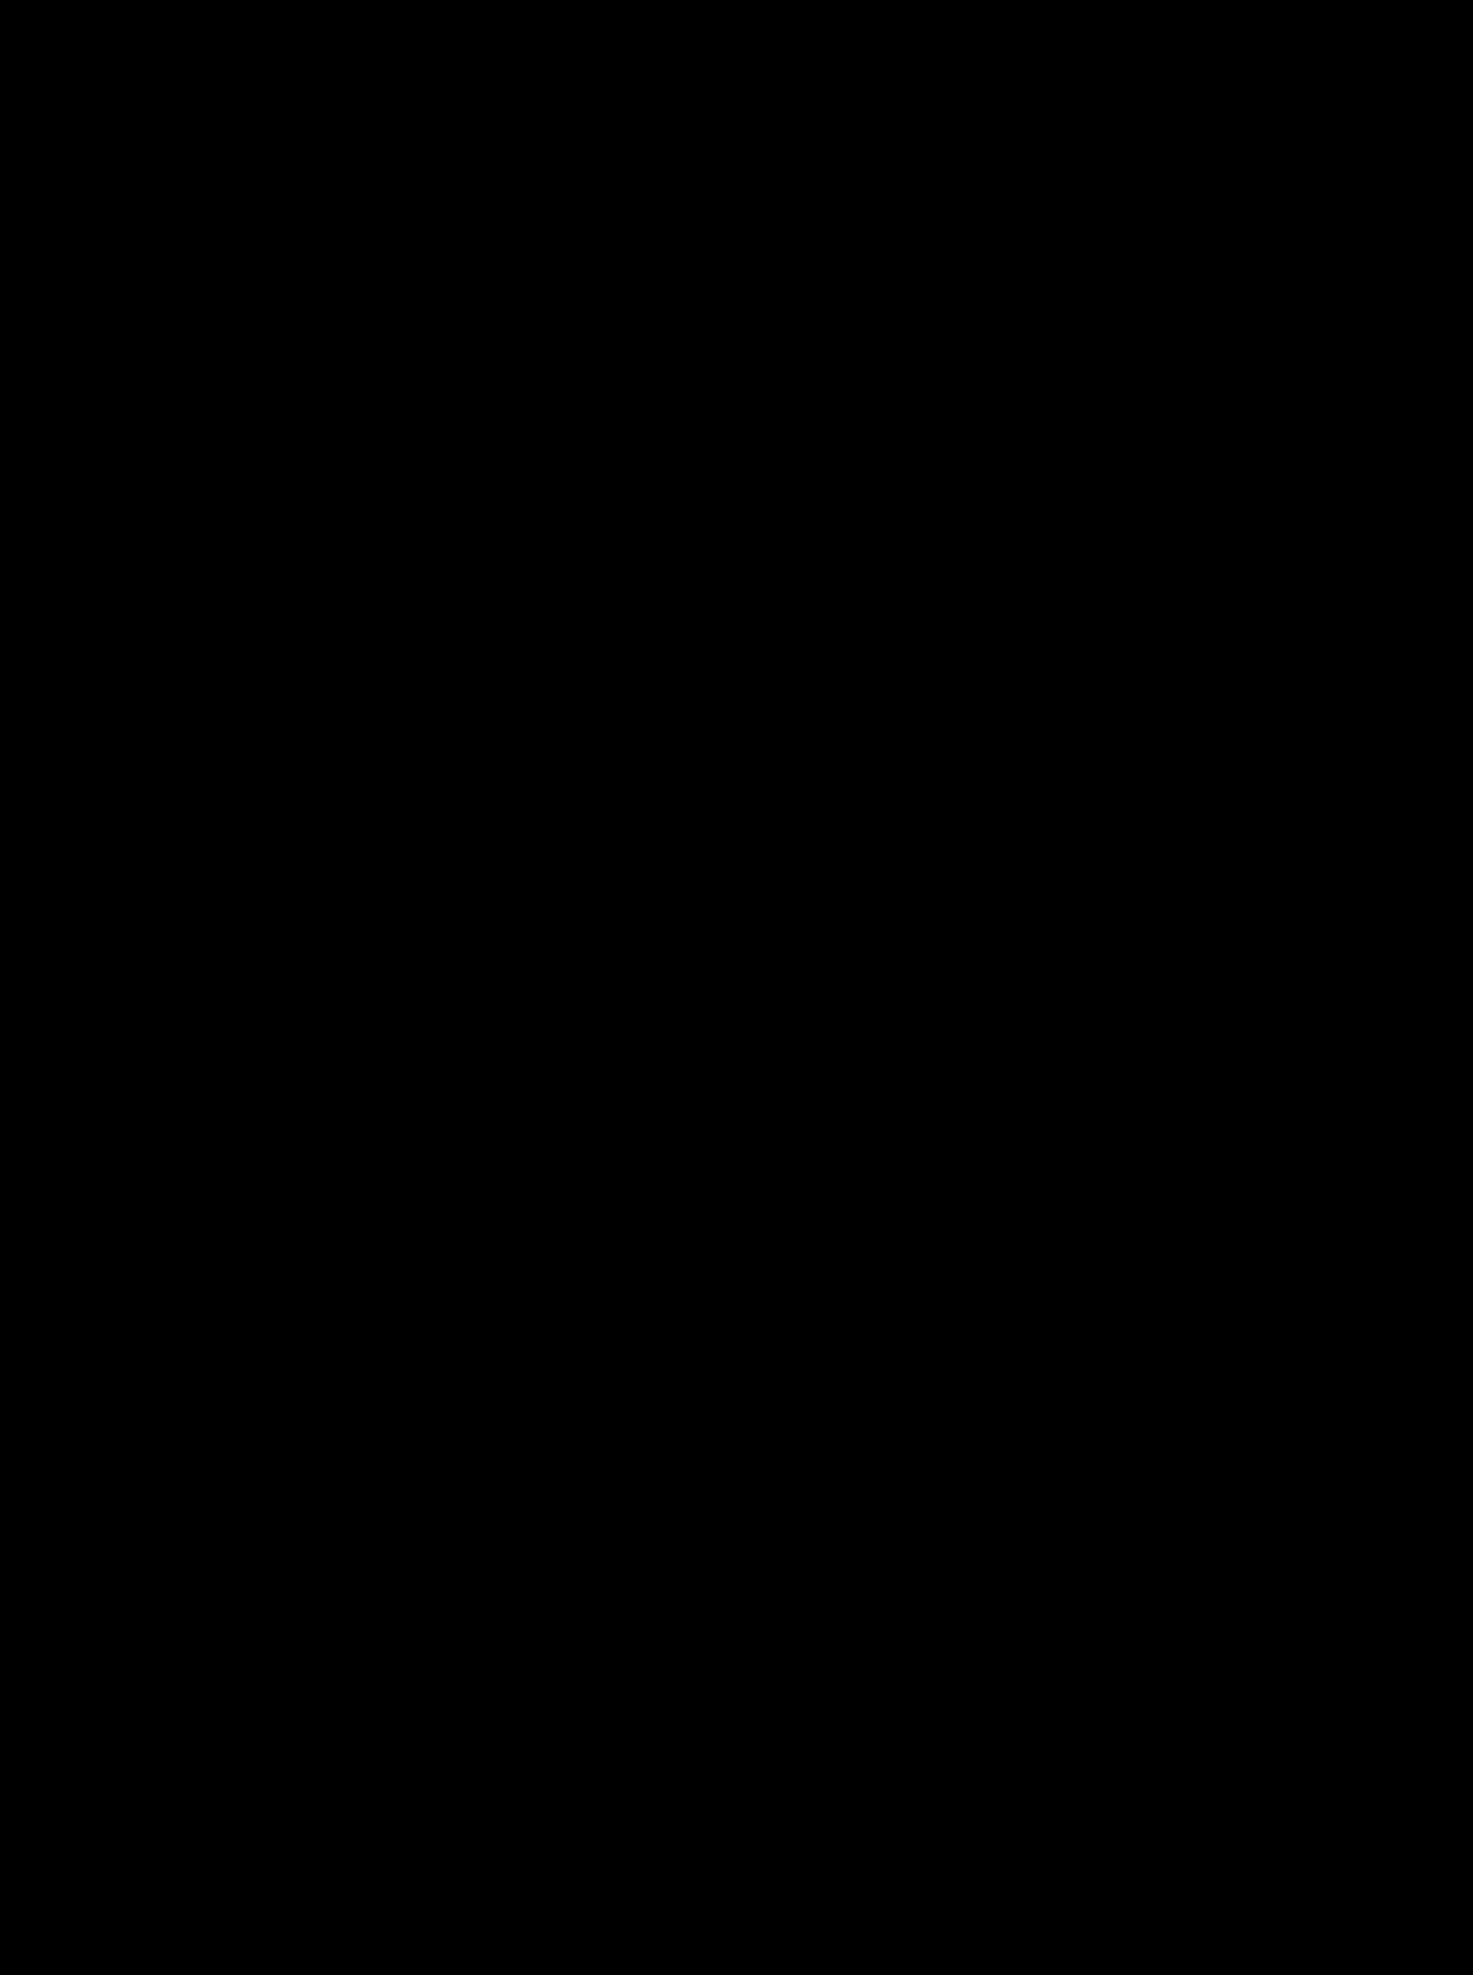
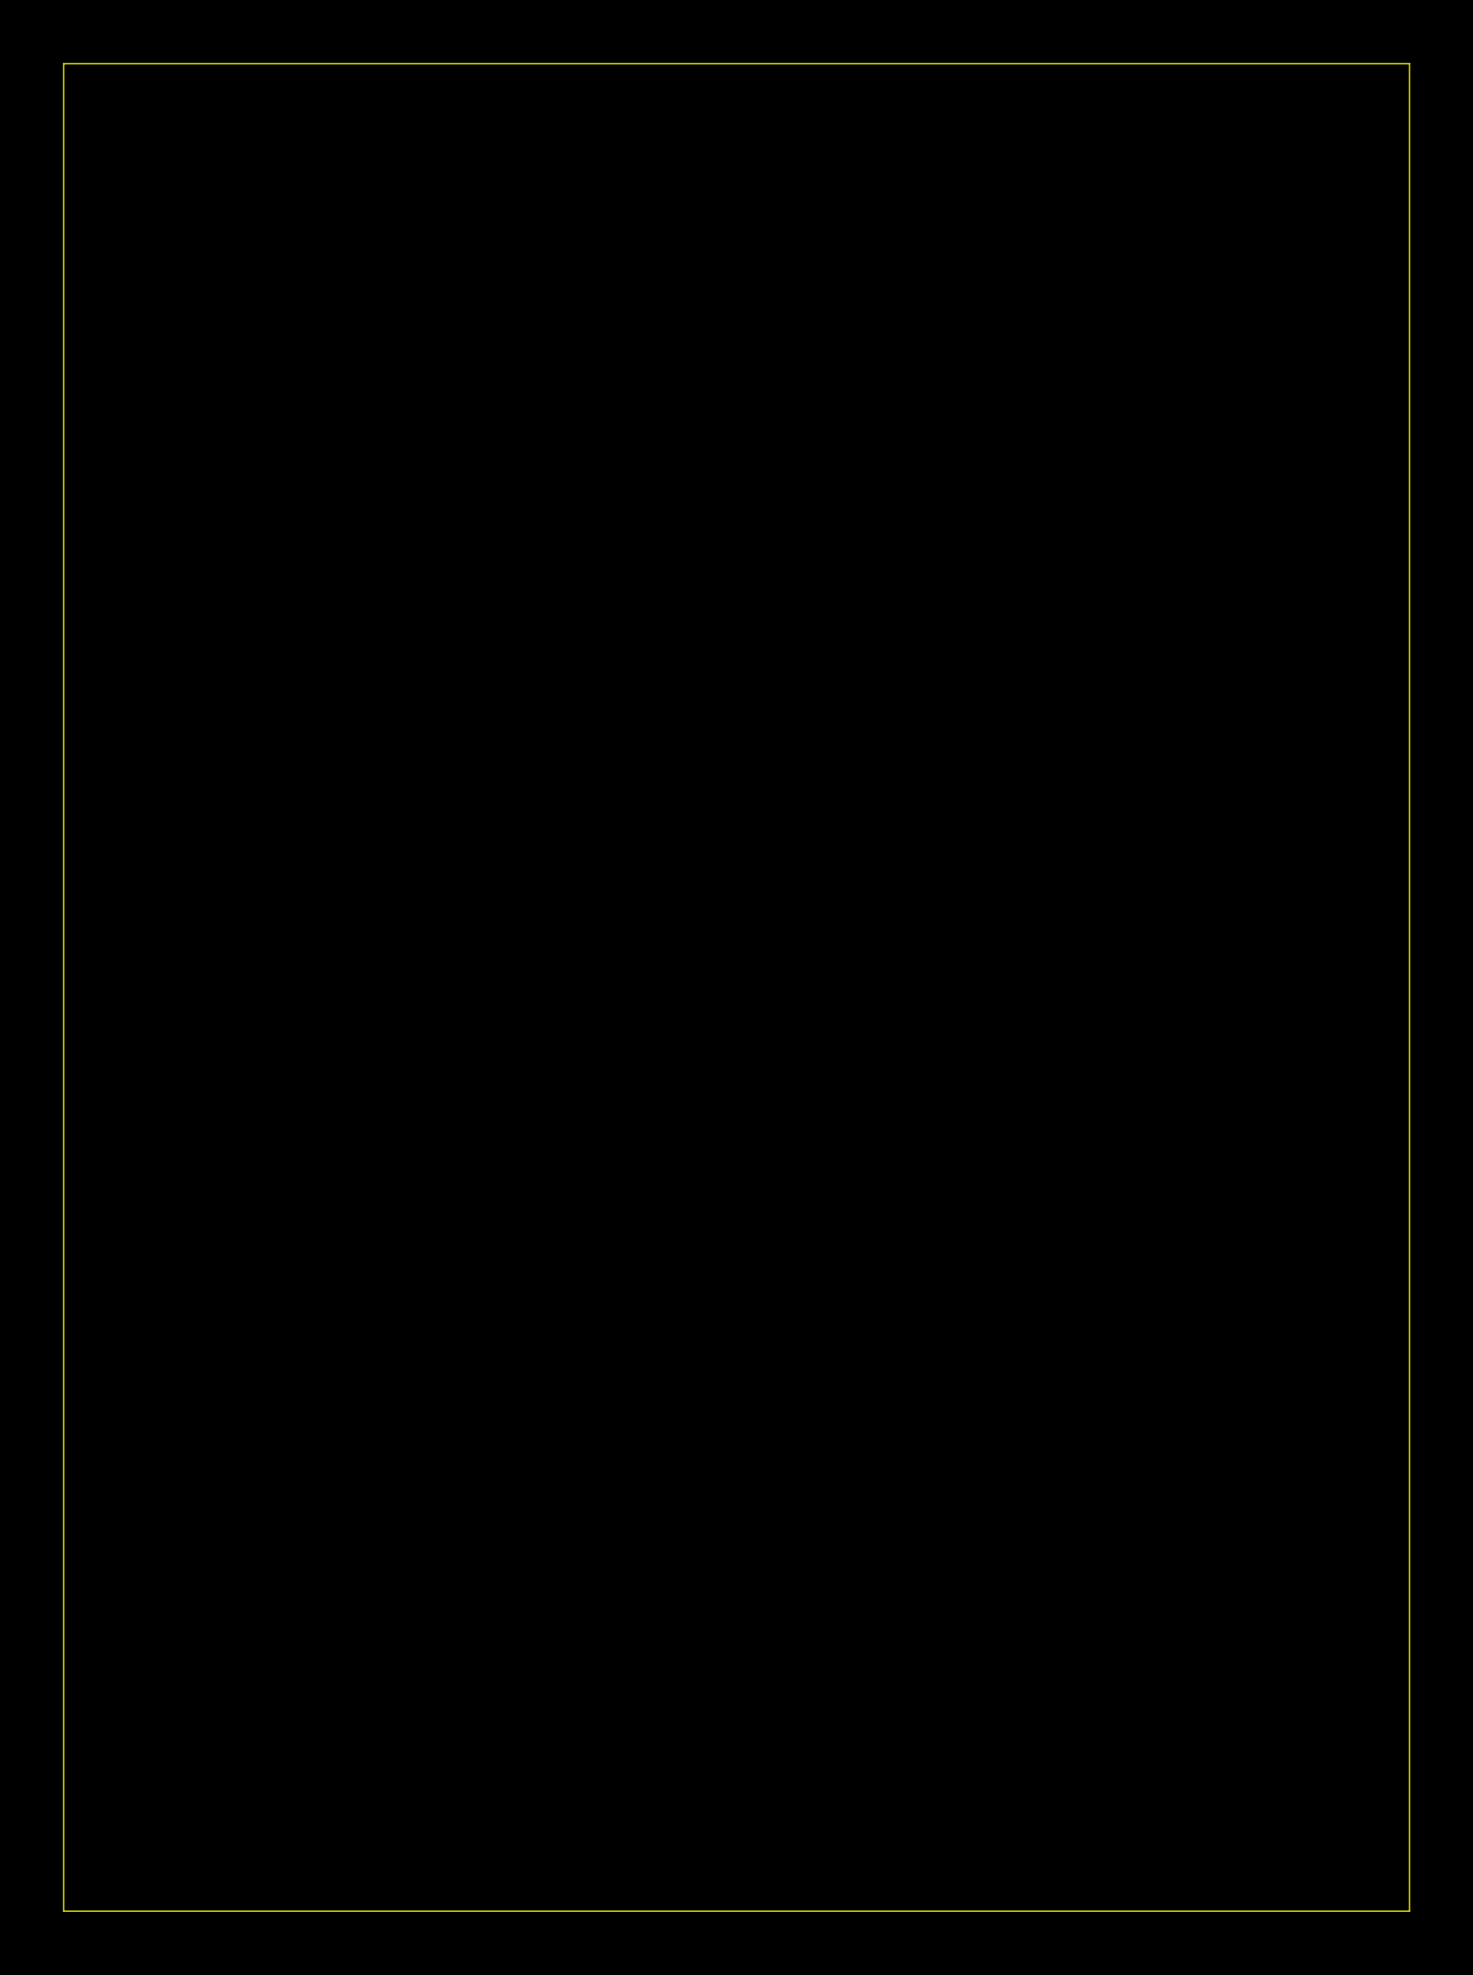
board edge: none -> (63, 63) (1409, 63) (1409, 1911) (63, 1911) (63, 63)

